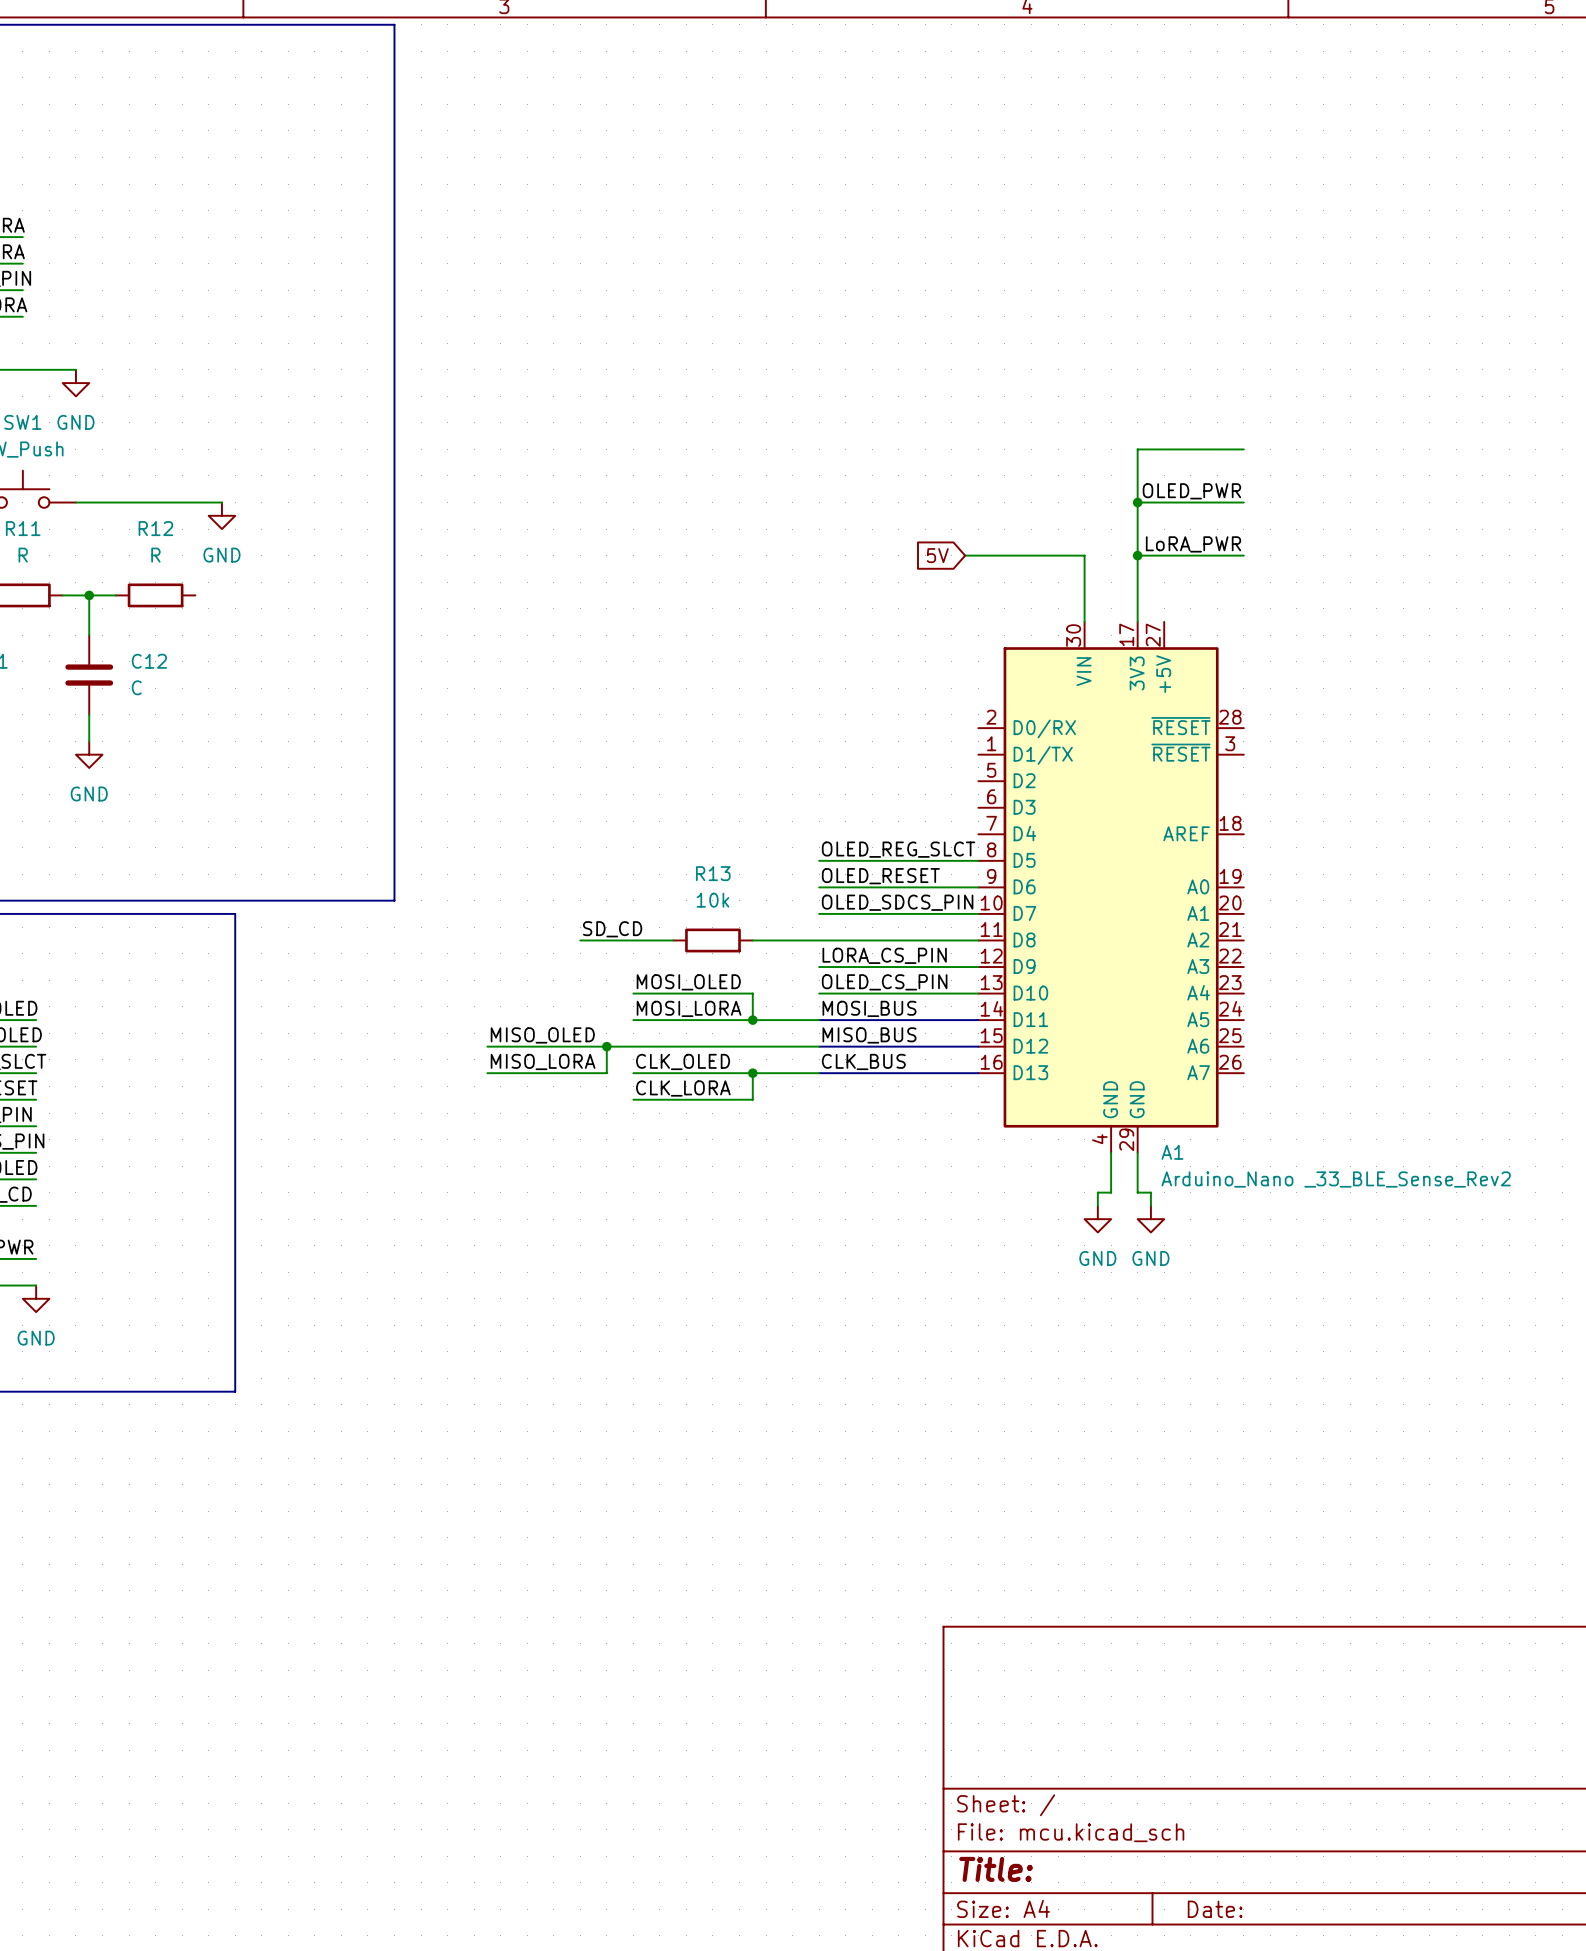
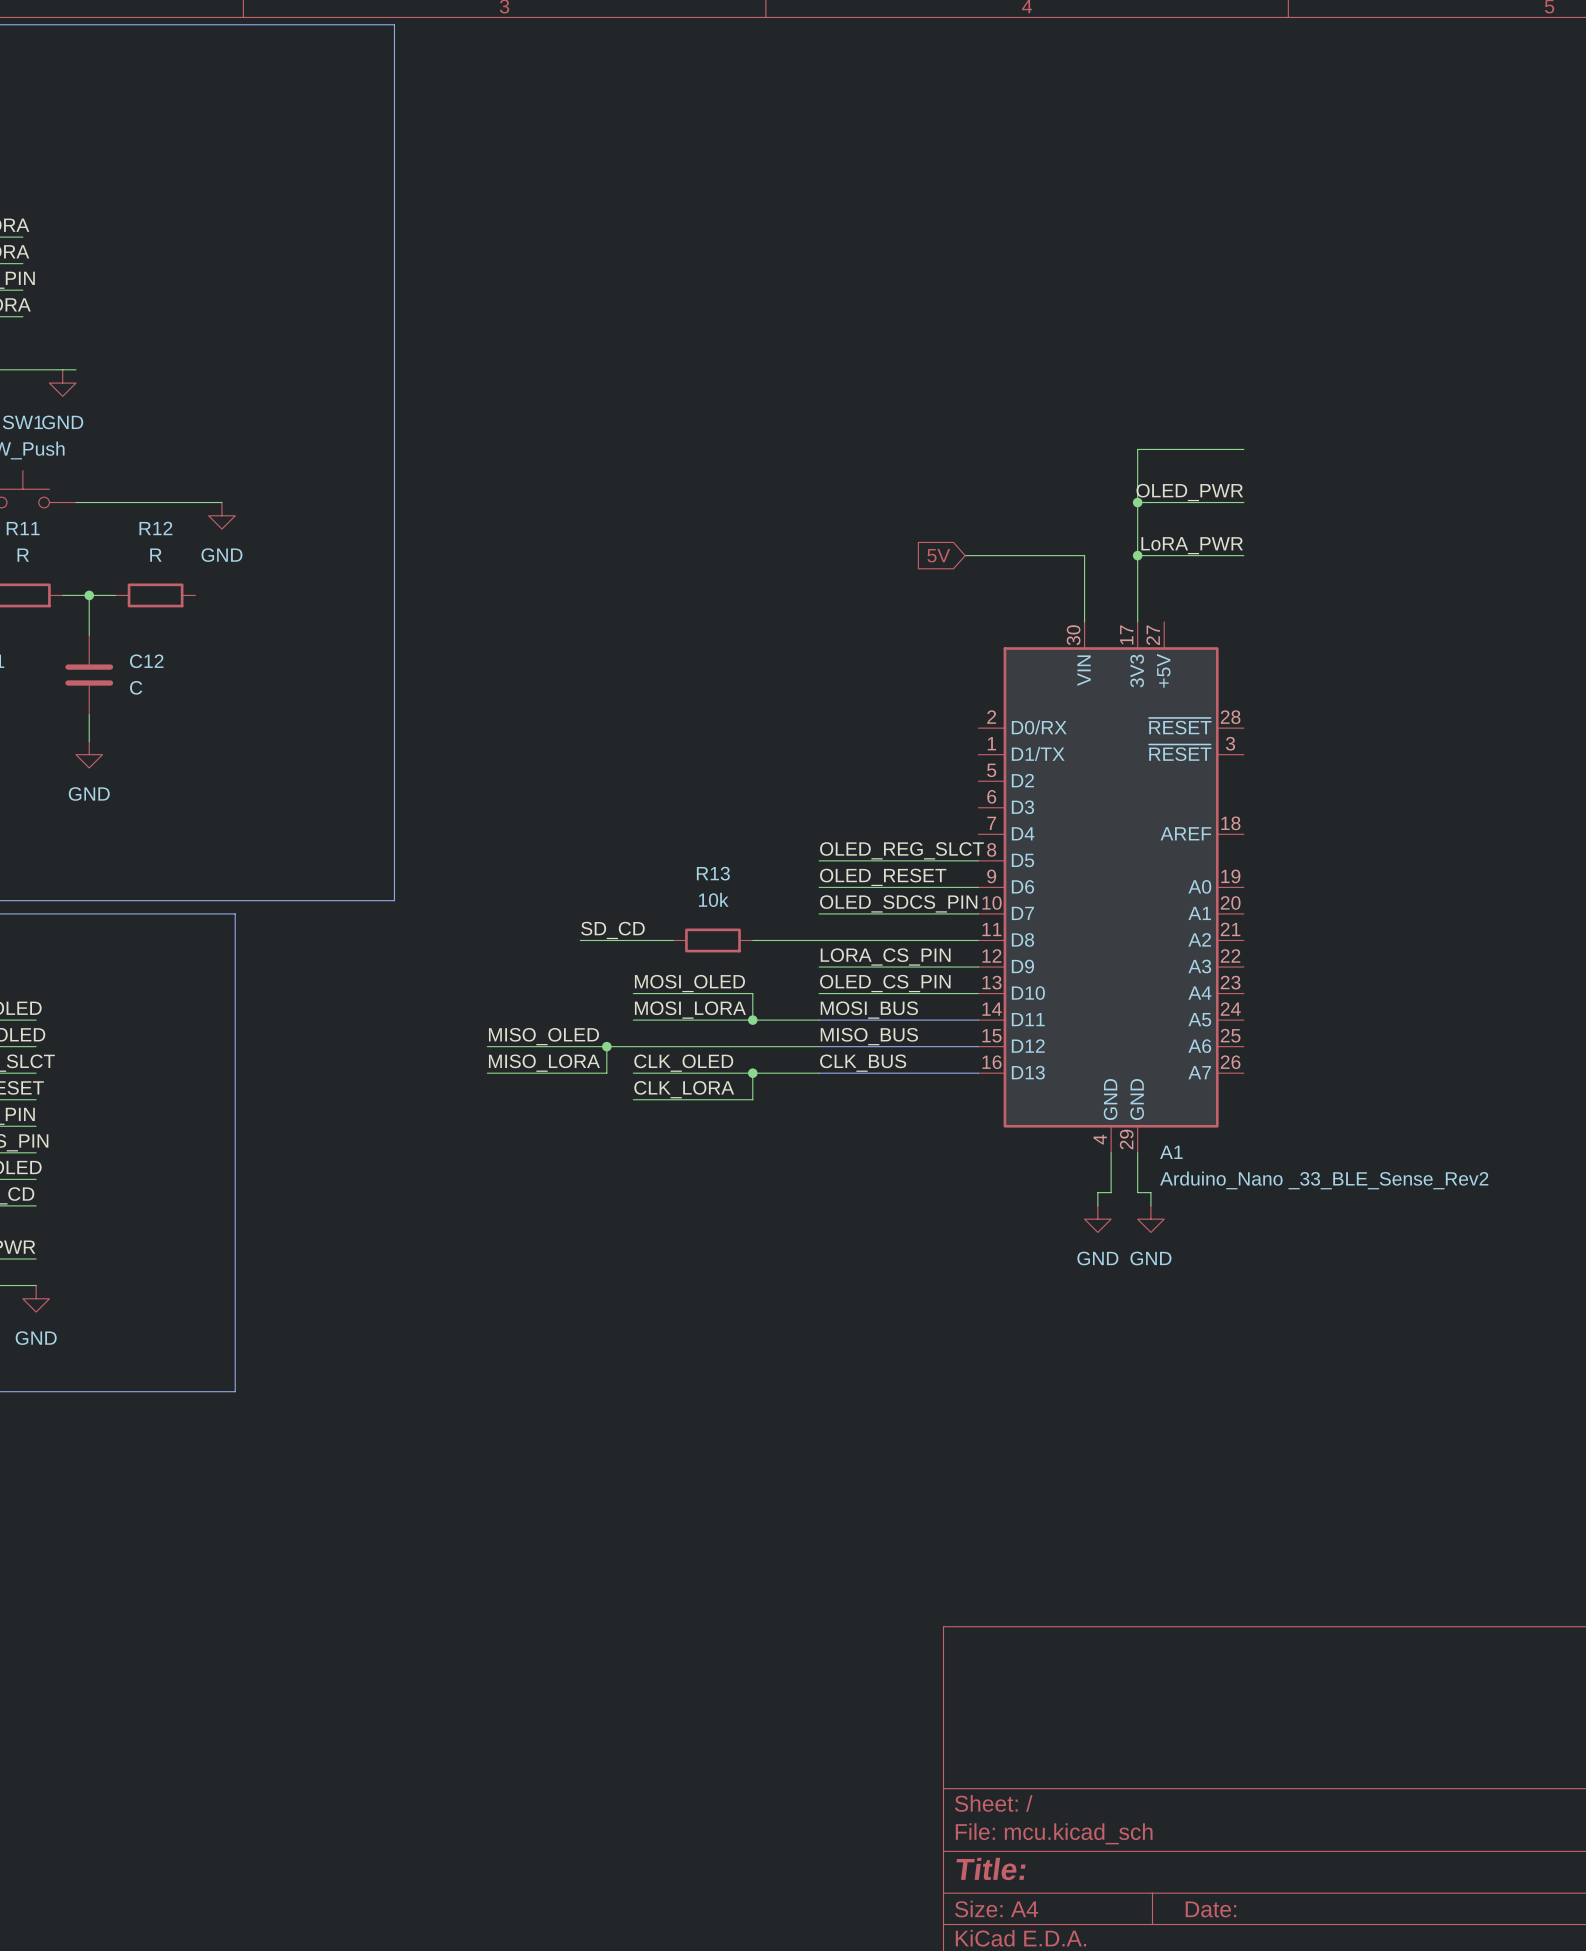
power symbol position: GND (75, 383) -> GND (62, 383)

